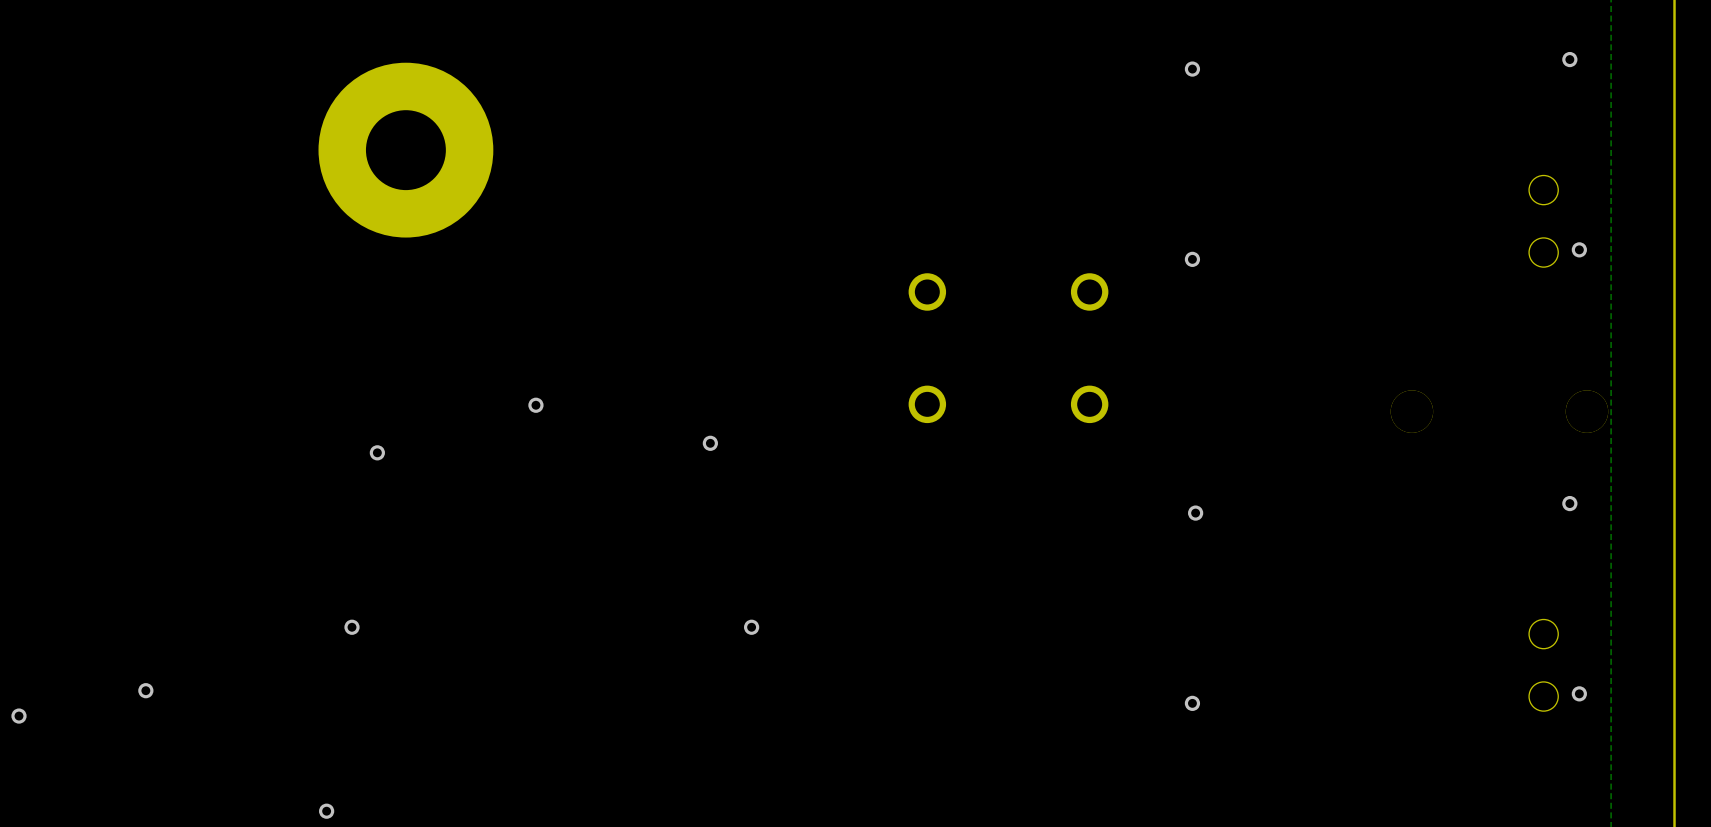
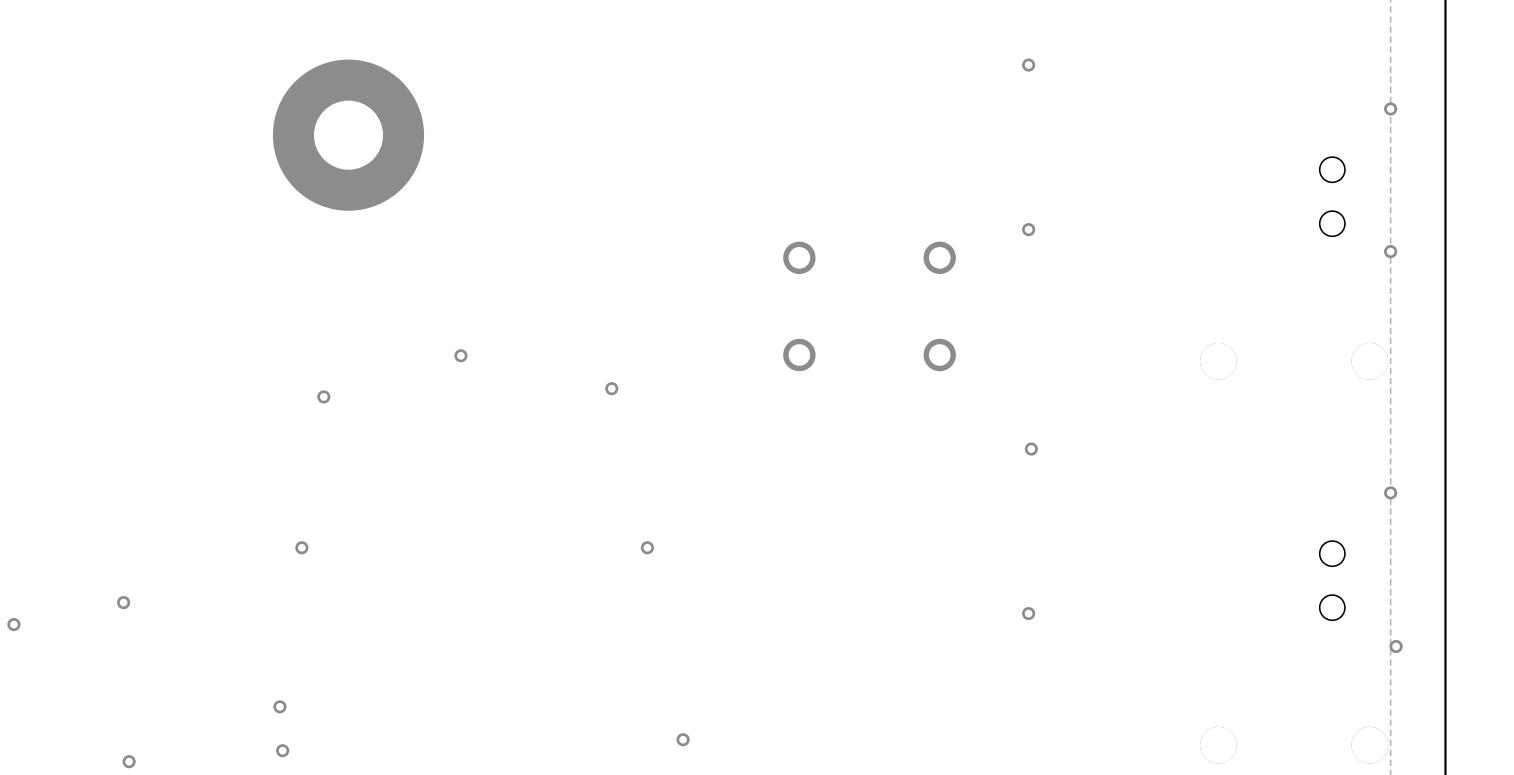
via: (1569, 59) -> none
via: none -> (1390, 108)
via position: (1579, 249) -> (1390, 251)
via: (1569, 503) -> none
via: none -> (1390, 492)
via position: (1579, 693) -> (1396, 646)

